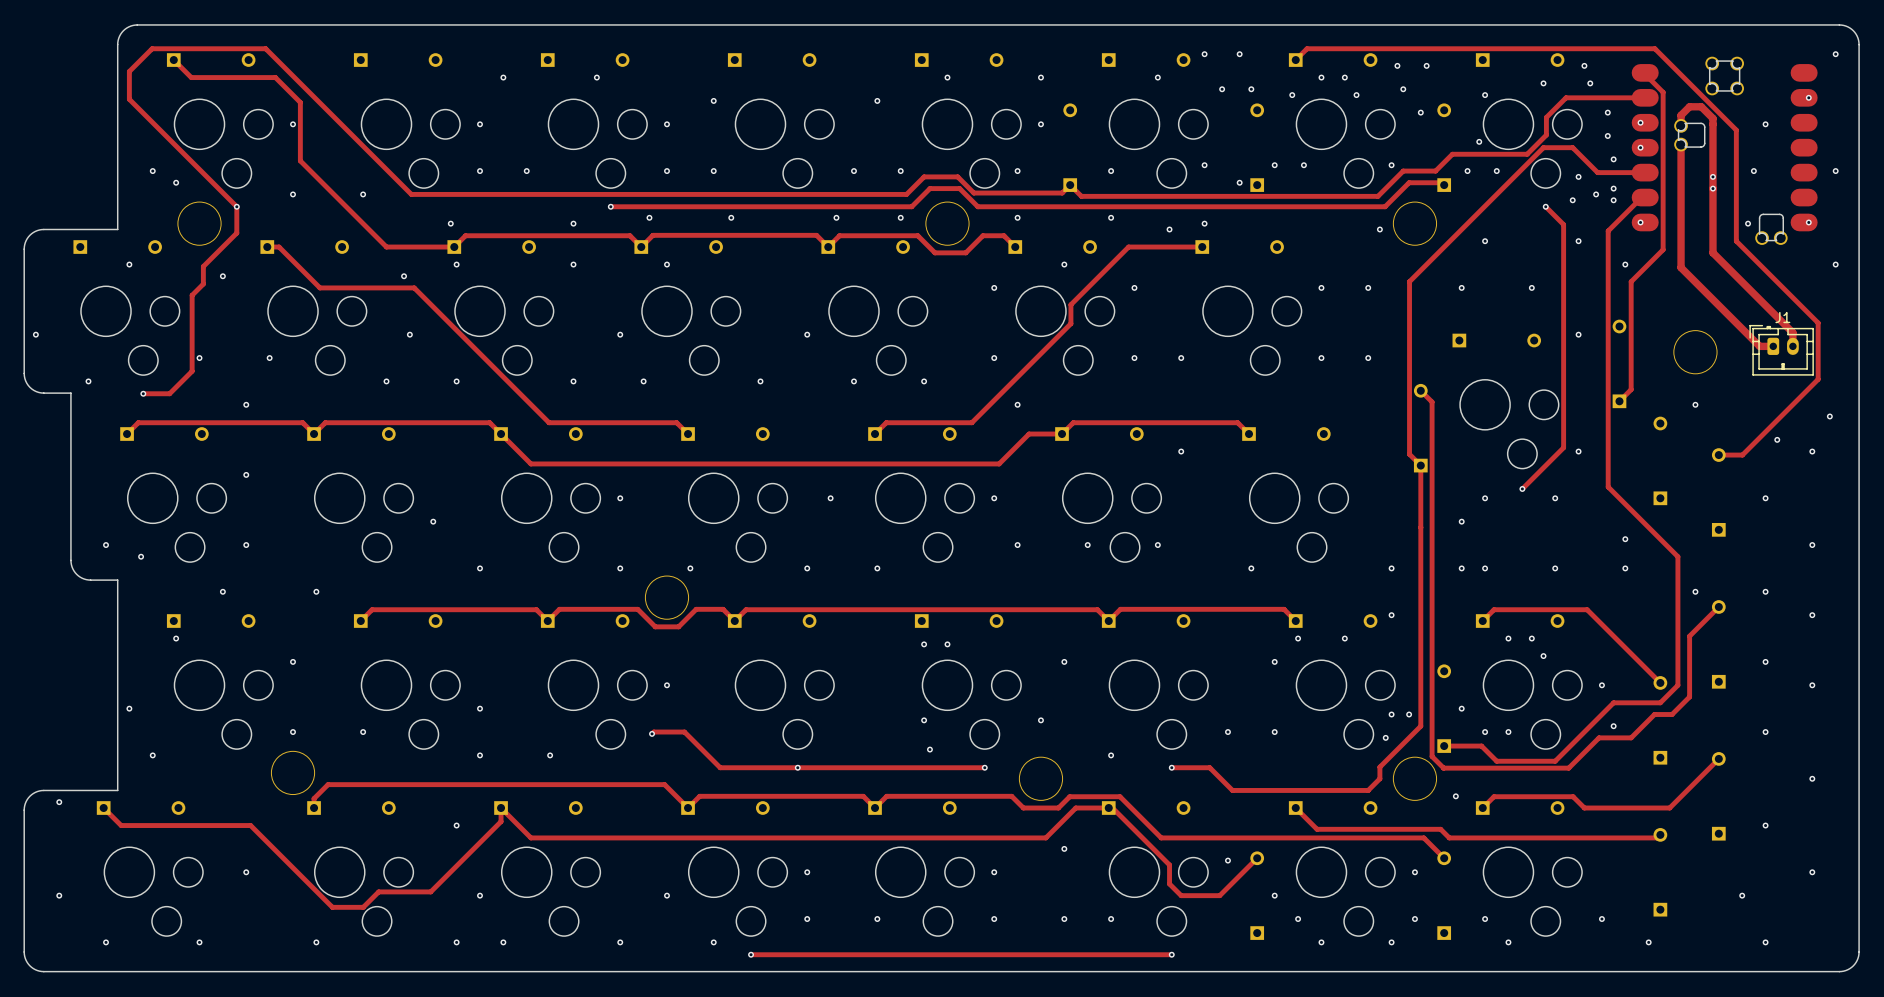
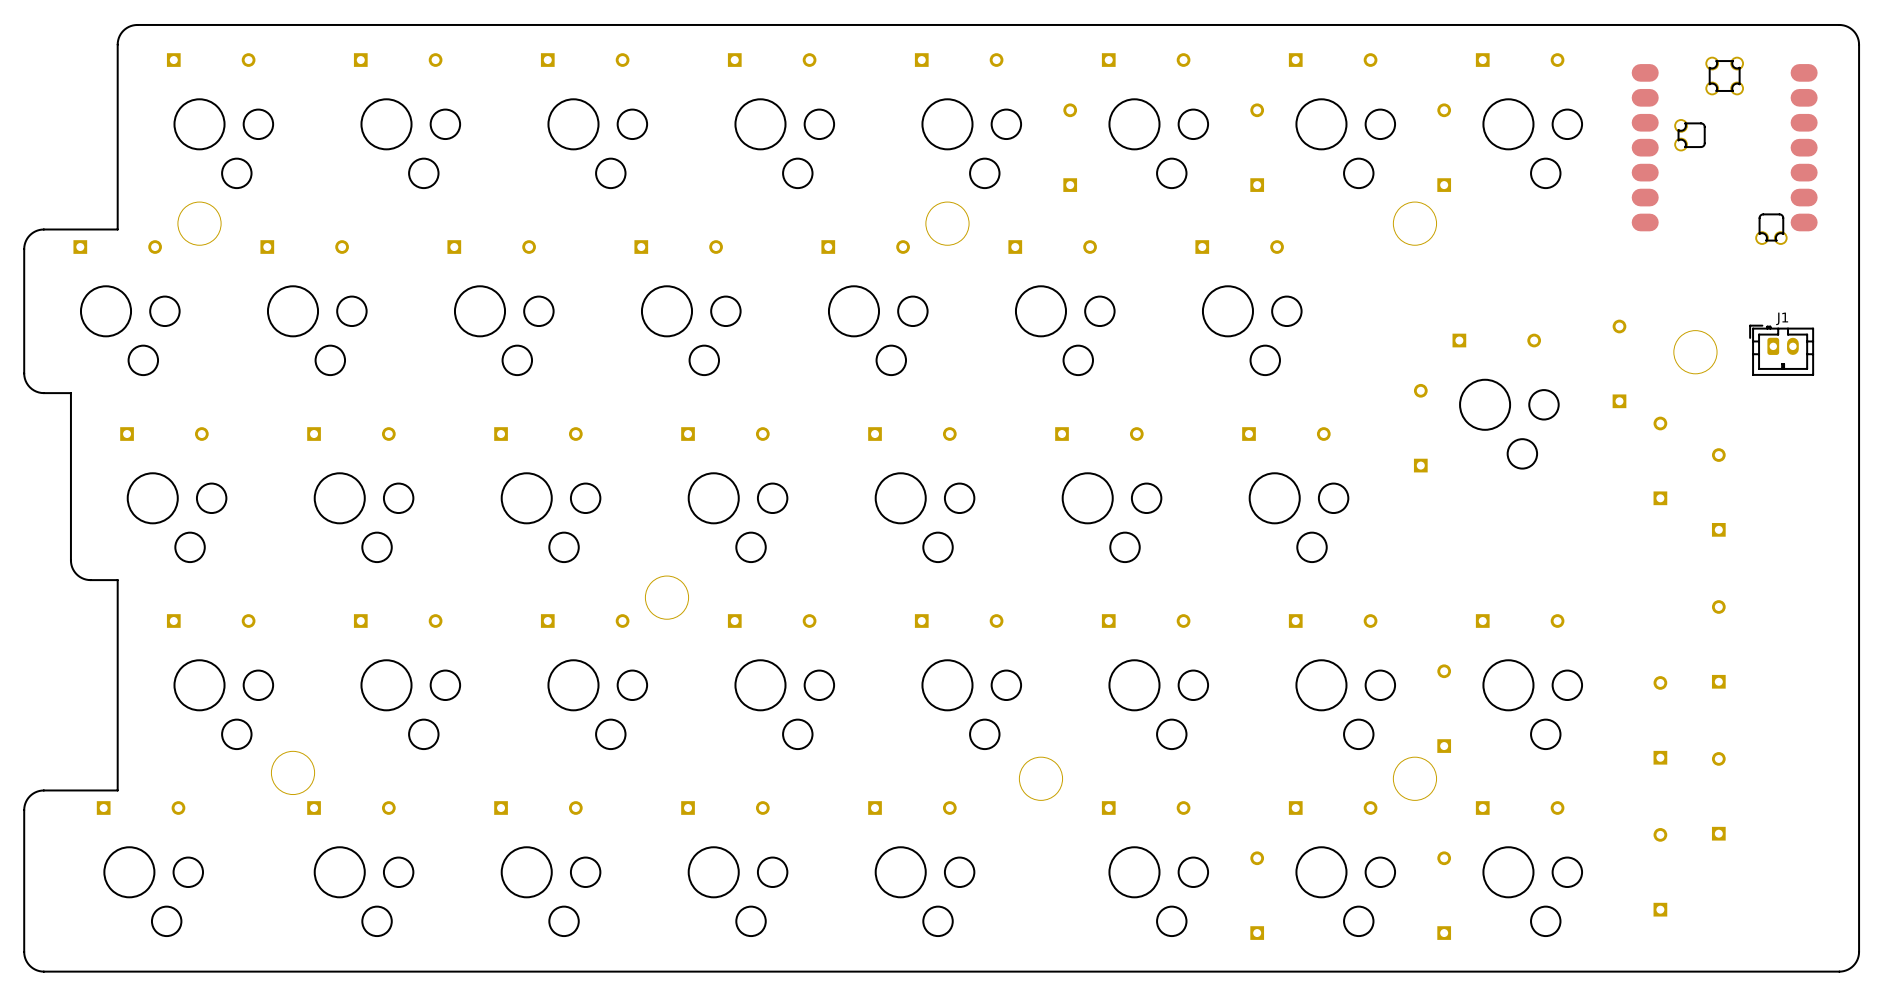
via: (1204, 54) -> none
via: (1239, 54) -> none
via: (1835, 54) -> none
track: (173, 60) (191, 77) (275, 77) (300, 102) (300, 160) (386, 247) (454, 247) (465, 235) (630, 235) (641, 247) (652, 235) (816, 235) (828, 247) (839, 235) (917, 235) (934, 252) (965, 252) (982, 235) (1003, 235) (1015, 247) -> none
track: (1295, 60) (1307, 48) (1654, 48) (1736, 130) (1736, 241) (1818, 322) (1818, 379) (1742, 455) (1718, 455) -> none
via: (1397, 65) -> none
via: (1426, 65) -> none
via: (1584, 65) -> none
track: (1640, 72) (1643, 72) (1663, 92) (1663, 249) (1631, 281) (1631, 389) (1619, 401) -> none
via: (503, 77) -> none
via: (596, 77) -> none
via: (947, 77) -> none
via: (1040, 77) -> none
via: (1157, 77) -> none
via: (1321, 77) -> none
via: (1344, 77) -> none
via: (1543, 83) -> none
via: (1590, 83) -> none
via: (1222, 89) -> none
via: (1251, 89) -> none
via: (1403, 89) -> none
via: (1292, 95) -> none
via: (1356, 95) -> none
via: (1485, 95) -> none
track: (1641, 97) (1566, 97) (1546, 117) (1546, 135) (1527, 154) (1452, 154) (1435, 171) (1403, 171) (1377, 196) (1081, 196) (1070, 185) (1062, 193) (973, 193) (957, 176) (924, 176) (906, 194) (411, 194) (265, 48) (152, 48) (129, 71) (129, 99) (236, 206) (236, 233) (203, 266) (203, 284) (192, 295) (192, 371) (169, 393) (143, 393) -> none
via: (1808, 97) -> none
via: (713, 100) -> none
via: (877, 100) -> none
via: (1420, 112) -> none
via: (1607, 112) -> none
via: (1640, 122) -> none
via: (293, 124) -> none
via: (480, 124) -> none
via: (666, 124) -> none
via: (1040, 124) -> none
via: (1765, 124) -> none
track: (1681, 125) (1681, 115) (1689, 106) (1701, 106) (1712, 118) (1712, 252) (1792, 332) (1792, 346) -> none
via: (1607, 136) -> none
via: (1479, 141) -> none
track: (1681, 144) (1681, 267) (1759, 346) (1773, 346) -> none
via: (1640, 147) -> none
via: (1613, 159) -> none
via: (1204, 165) -> none
via: (1274, 165) -> none
via: (1303, 165) -> none
via: (1391, 165) -> none
via: (152, 171) -> none
via: (480, 171) -> none
via: (526, 171) -> none
via: (666, 171) -> none
via: (713, 171) -> none
via: (853, 171) -> none
via: (900, 171) -> none
via: (1017, 171) -> none
via: (1111, 171) -> none
via: (1467, 171) -> none
via: (1496, 171) -> none
via: (1753, 171) -> none
via: (1835, 171) -> none
track: (1641, 172) (1597, 172) (1572, 147) (1543, 147) (1409, 281) (1409, 454) (1420, 465) (1420, 726) (1379, 767) (1379, 778) (1368, 790) (1232, 790) (1209, 767) (1171, 767) -> none
via: (1578, 176) -> none
via: (1712, 176) -> none
via: (176, 182) -> none
via: (1239, 182) -> none
track: (1444, 185) (1441, 182) (1409, 182) (1385, 206) (977, 206) (959, 188) (929, 188) (911, 206) (610, 206) -> none
via: (1613, 188) -> none
via: (1712, 188) -> none
via: (293, 194) -> none
via: (363, 194) -> none
via: (1596, 194) -> none
track: (1641, 197) (1608, 231) (1608, 487) (1677, 556) (1677, 685) (1660, 702) (1613, 702) (1555, 761) (1496, 761) (1481, 746) (1444, 746) -> none
via: (1572, 200) -> none
via: (1613, 200) -> none
via: (236, 206) -> none
via: (610, 206) -> none
track: (1545, 206) (1563, 224) (1563, 447) (1522, 488) -> none
via: (1545, 206) -> none
via: (649, 217) -> none
via: (731, 217) -> none
via: (836, 217) -> none
via: (900, 217) -> none
via: (1017, 217) -> none
via: (1111, 217) -> none
via: (1640, 222) -> none
via: (1808, 222) -> none
via: (450, 223) -> none
via: (573, 223) -> none
via: (1204, 223) -> none
via: (1748, 223) -> none
via: (1169, 229) -> none
via: (1379, 229) -> none
via: (1485, 241) -> none
via: (1578, 241) -> none
track: (267, 247) (279, 247) (319, 287) (414, 287) (549, 422) (676, 422) (688, 434) -> none
track: (1202, 247) (1128, 247) (1070, 304) (1070, 323) (971, 422) (886, 422) (875, 434) -> none
via: (129, 264) -> none
via: (456, 264) -> none
via: (573, 264) -> none
via: (666, 264) -> none
via: (1064, 264) -> none
via: (1625, 264) -> none
via: (1835, 264) -> none
via: (222, 276) -> none
via: (404, 276) -> none
via: (994, 287) -> none
via: (1134, 287) -> none
via: (1321, 287) -> none
via: (1368, 287) -> none
via: (1461, 287) -> none
via: (1531, 287) -> none
via: (35, 334) -> none
via: (409, 334) -> none
via: (620, 334) -> none
via: (807, 334) -> none
via: (1578, 334) -> none
via: (199, 358) -> none
via: (269, 358) -> none
via: (994, 358) -> none
via: (1134, 358) -> none
via: (1181, 358) -> none
via: (1321, 358) -> none
via: (1368, 358) -> none
via: (88, 381) -> none
via: (386, 381) -> none
via: (456, 381) -> none
via: (573, 381) -> none
via: (643, 381) -> none
via: (760, 381) -> none
via: (853, 381) -> none
via: (924, 381) -> none
track: (1420, 390) (1432, 402) (1432, 756) (1443, 768) (1568, 768) (1599, 737) (1631, 737) (1654, 714) (1672, 714) (1689, 696) (1689, 636) (1718, 606) -> none
via: (143, 393) -> none
via: (246, 404) -> none
via: (1017, 404) -> none
via: (1695, 404) -> none
via: (1829, 416) -> none
track: (127, 434) (138, 422) (302, 422) (314, 434) (325, 422) (489, 422) (530, 463) (999, 463) (1029, 434) (1062, 434) (1073, 422) (1237, 422) (1249, 434) -> none
via: (1777, 439) -> none
via: (1181, 451) -> none
via: (1578, 451) -> none
via: (1812, 451) -> none
via: (246, 474) -> none
via: (1522, 488) -> none
via: (620, 498) -> none
via: (830, 498) -> none
via: (994, 498) -> none
via: (1485, 498) -> none
via: (1555, 498) -> none
via: (1765, 498) -> none
via: (433, 521) -> none
via: (1461, 521) -> none
via: (1625, 539) -> none
via: (106, 545) -> none
via: (246, 545) -> none
via: (1017, 545) -> none
via: (1087, 545) -> none
via: (1157, 545) -> none
via: (1812, 545) -> none
via: (141, 556) -> none
via: (480, 568) -> none
via: (620, 568) -> none
via: (690, 568) -> none
via: (807, 568) -> none
via: (877, 568) -> none
via: (1251, 568) -> none
via: (1391, 568) -> none
via: (1461, 568) -> none
via: (1485, 568) -> none
via: (1555, 568) -> none
via: (1625, 568) -> none
via: (222, 591) -> none
via: (316, 591) -> none
via: (1695, 591) -> none
via: (1765, 591) -> none
via: (1391, 615) -> none
via: (1812, 615) -> none
track: (360, 621) (372, 609) (536, 609) (547, 621) (559, 609) (637, 609) (655, 626) (678, 626) (696, 609) (723, 609) (734, 621) (746, 609) (1097, 609) (1108, 621) (1120, 609) (1284, 609) (1295, 621) -> none
track: (1482, 621) (1494, 609) (1587, 609) (1660, 682) -> none
via: (176, 638) -> none
via: (1298, 638) -> none
via: (1344, 638) -> none
via: (1508, 638) -> none
via: (1531, 638) -> none
via: (924, 644) -> none
via: (947, 644) -> none
via: (1543, 656) -> none
via: (293, 661) -> none
via: (1064, 661) -> none
via: (1274, 661) -> none
via: (1765, 661) -> none
via: (666, 685) -> none
via: (1601, 685) -> none
via: (1812, 685) -> none
via: (129, 708) -> none
via: (480, 708) -> none
via: (1461, 708) -> none
via: (1391, 714) -> none
via: (1409, 714) -> none
via: (924, 720) -> none
via: (1040, 720) -> none
via: (1613, 726) -> none
via: (293, 732) -> none
via: (363, 732) -> none
via: (1227, 732) -> none
via: (1274, 732) -> none
via: (1485, 732) -> none
via: (1508, 732) -> none
via: (1765, 732) -> none
track: (652, 733) (653, 732) (684, 732) (720, 767) (984, 767) -> none
via: (652, 733) -> none
via: (1385, 737) -> none
via: (929, 749) -> none
via: (152, 755) -> none
via: (480, 755) -> none
via: (550, 755) -> none
via: (1111, 755) -> none
track: (1718, 758) (1669, 808) (1584, 808) (1573, 796) (1494, 796) (1482, 808) -> none
via: (797, 767) -> none
via: (984, 767) -> none
via: (1171, 767) -> none
via: (1812, 778) -> none
via: (1455, 796) -> none
via: (59, 802) -> none
track: (103, 808) (121, 825) (250, 825) (332, 907) (363, 907) (378, 891) (430, 891) (501, 821) (501, 808) (530, 837) (1045, 837) (1075, 808) (1112, 808) (1169, 864) (1169, 883) (1181, 895) (1219, 895) (1257, 858) -> none
track: (314, 808) (314, 798) (328, 784) (664, 784) (688, 808) (699, 796) (863, 796) (875, 808) (886, 796) (1011, 796) (1023, 808) (1058, 808) (1069, 796) (1120, 796) (1161, 837) (1423, 837) (1444, 858) -> none
track: (1295, 808) (1317, 829) (1440, 829) (1449, 837) (1657, 837) (1660, 834) -> none
via: (456, 825) -> none
via: (1765, 825) -> none
via: (1064, 848) -> none
via: (1227, 860) -> none
via: (246, 872) -> none
via: (807, 872) -> none
via: (994, 872) -> none
via: (1414, 872) -> none
via: (1812, 872) -> none
via: (59, 895) -> none
via: (480, 895) -> none
via: (666, 895) -> none
via: (1274, 895) -> none
via: (1742, 895) -> none
via: (807, 919) -> none
via: (877, 919) -> none
via: (994, 919) -> none
via: (1064, 919) -> none
via: (1111, 919) -> none
via: (1298, 919) -> none
via: (1414, 919) -> none
via: (1485, 919) -> none
via: (1601, 919) -> none
via: (106, 942) -> none
via: (199, 942) -> none
via: (316, 942) -> none
via: (456, 942) -> none
via: (503, 942) -> none
via: (620, 942) -> none
via: (713, 942) -> none
via: (1321, 942) -> none
via: (1391, 942) -> none
via: (1508, 942) -> none
via: (1648, 942) -> none
via: (1765, 942) -> none
track: (751, 954) (1171, 954) -> none
via: (751, 954) -> none
via: (1171, 954) -> none

